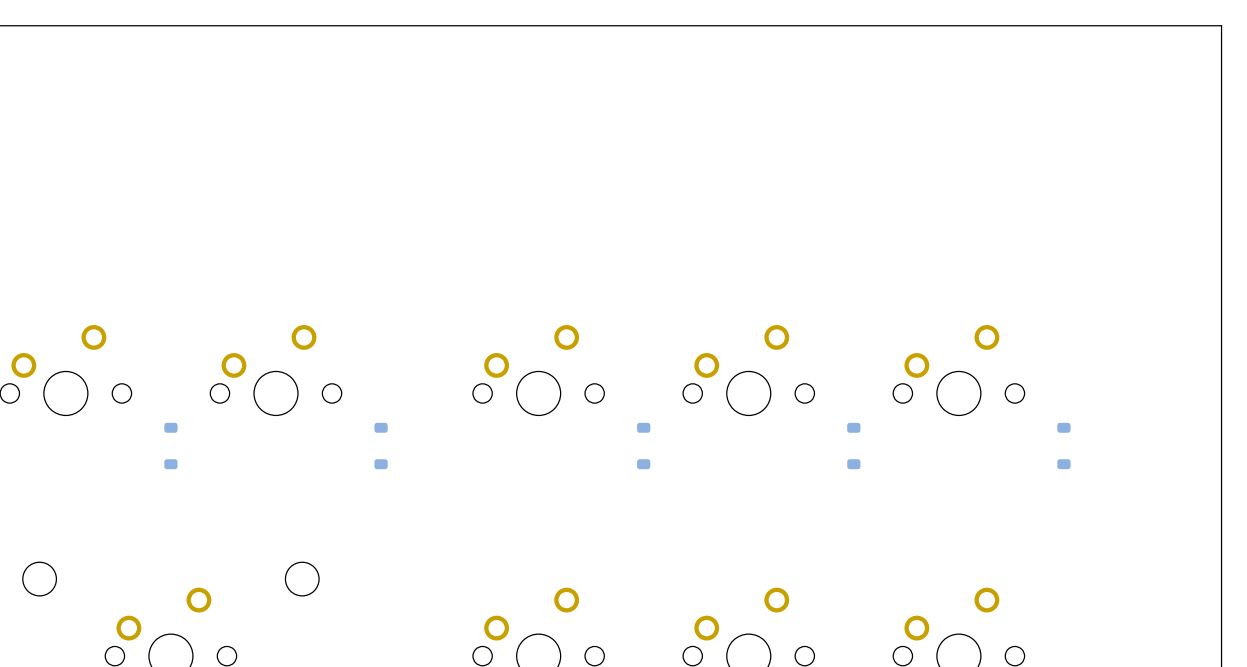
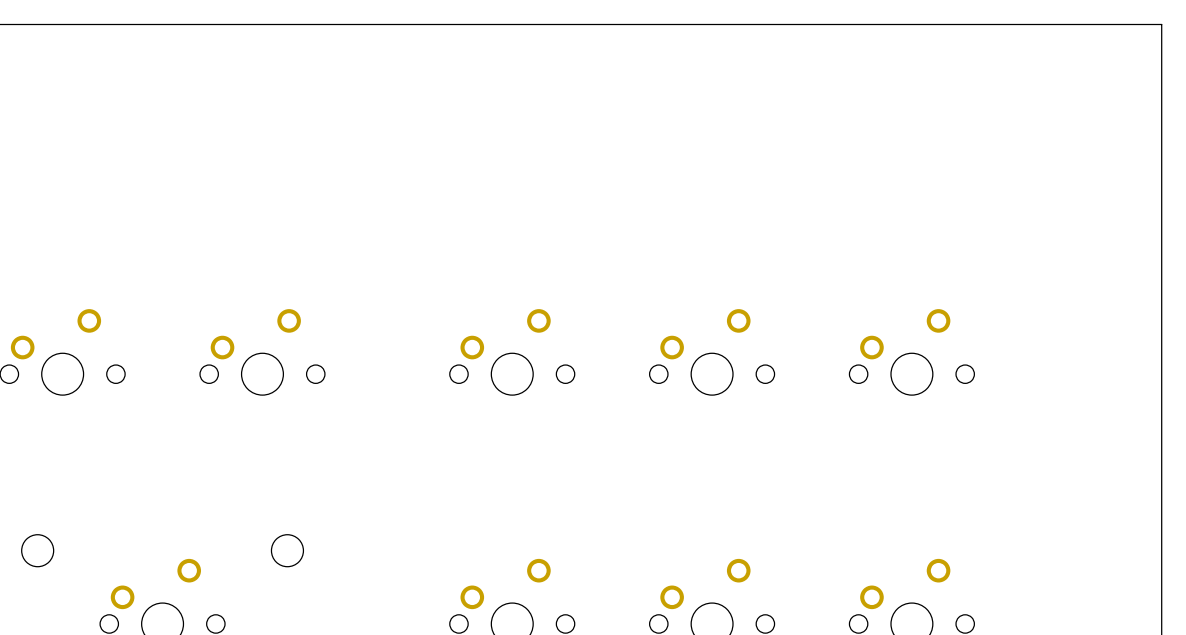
part: (170, 446) -> none
part: (381, 446) -> none
part: (643, 446) -> none
part: (853, 446) -> none
part: (1063, 446) -> none

